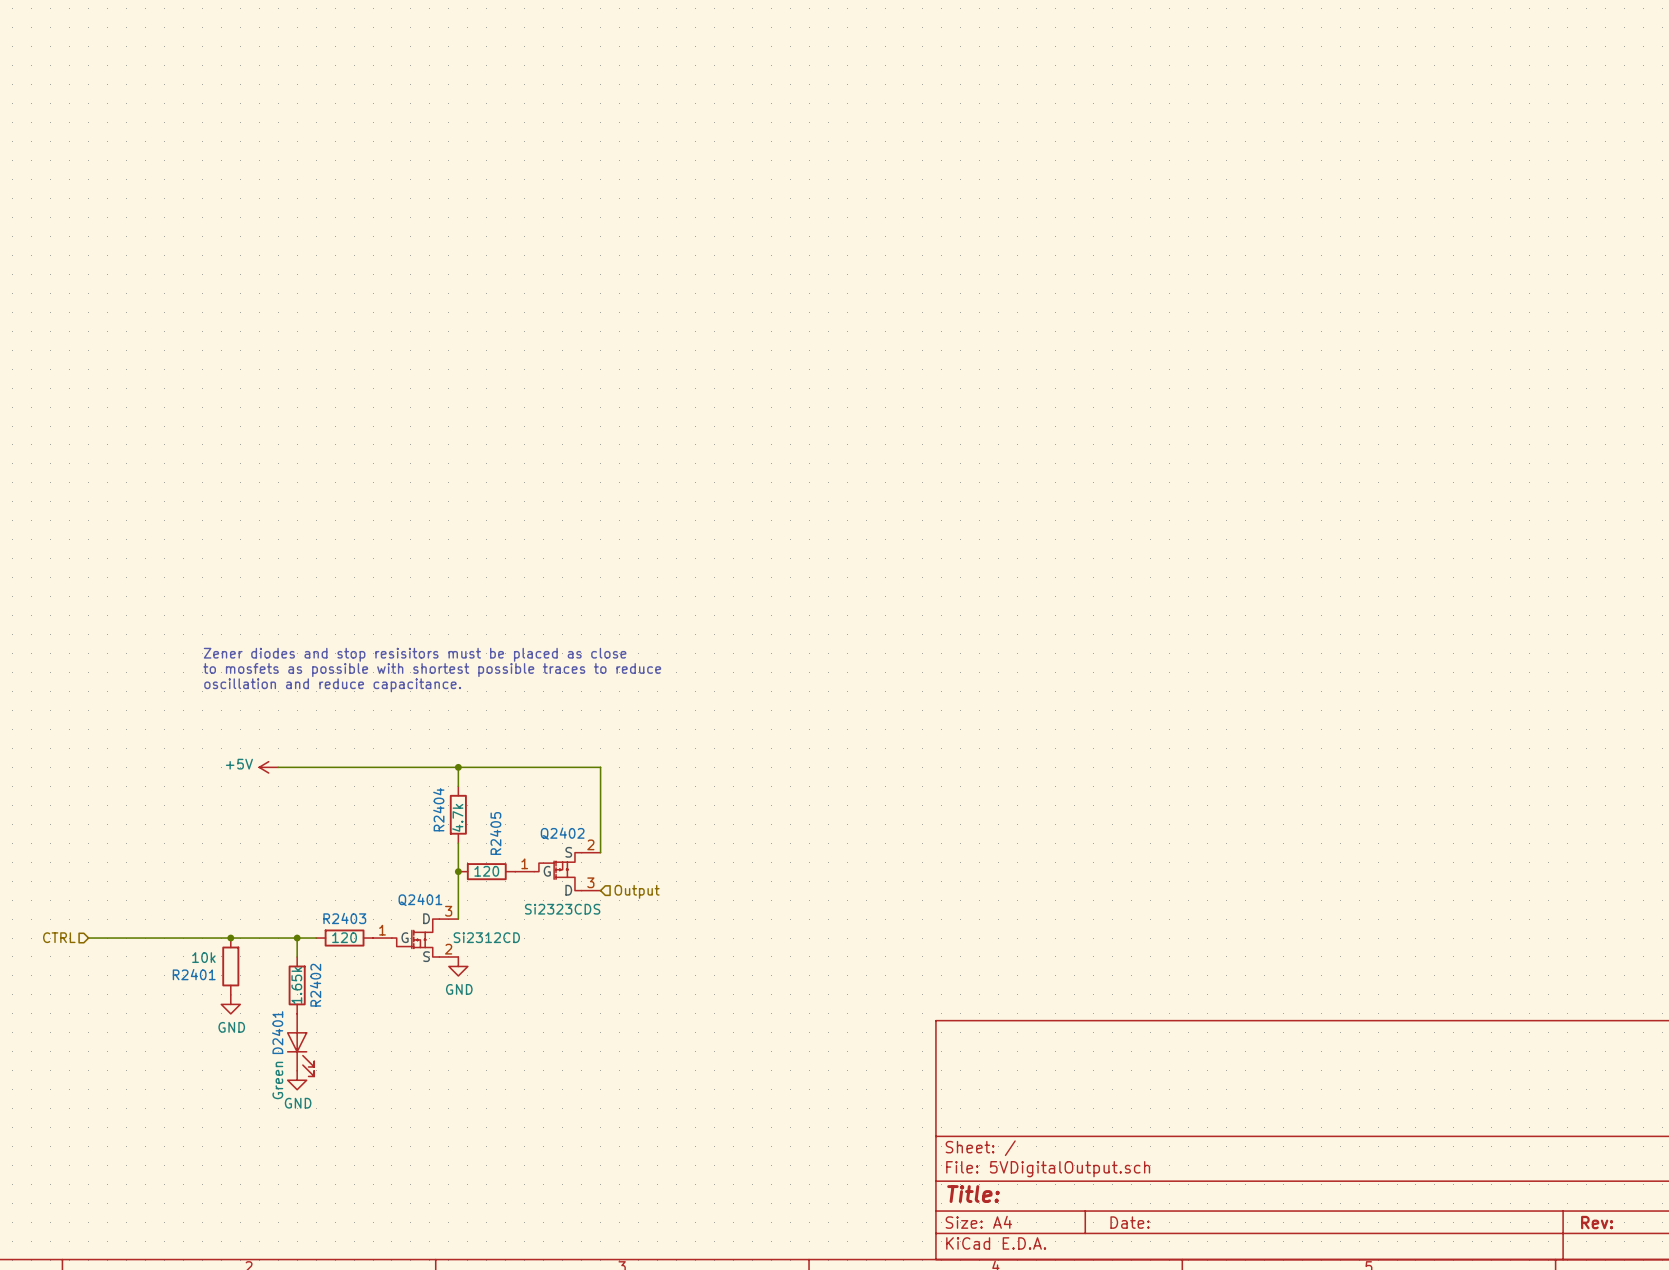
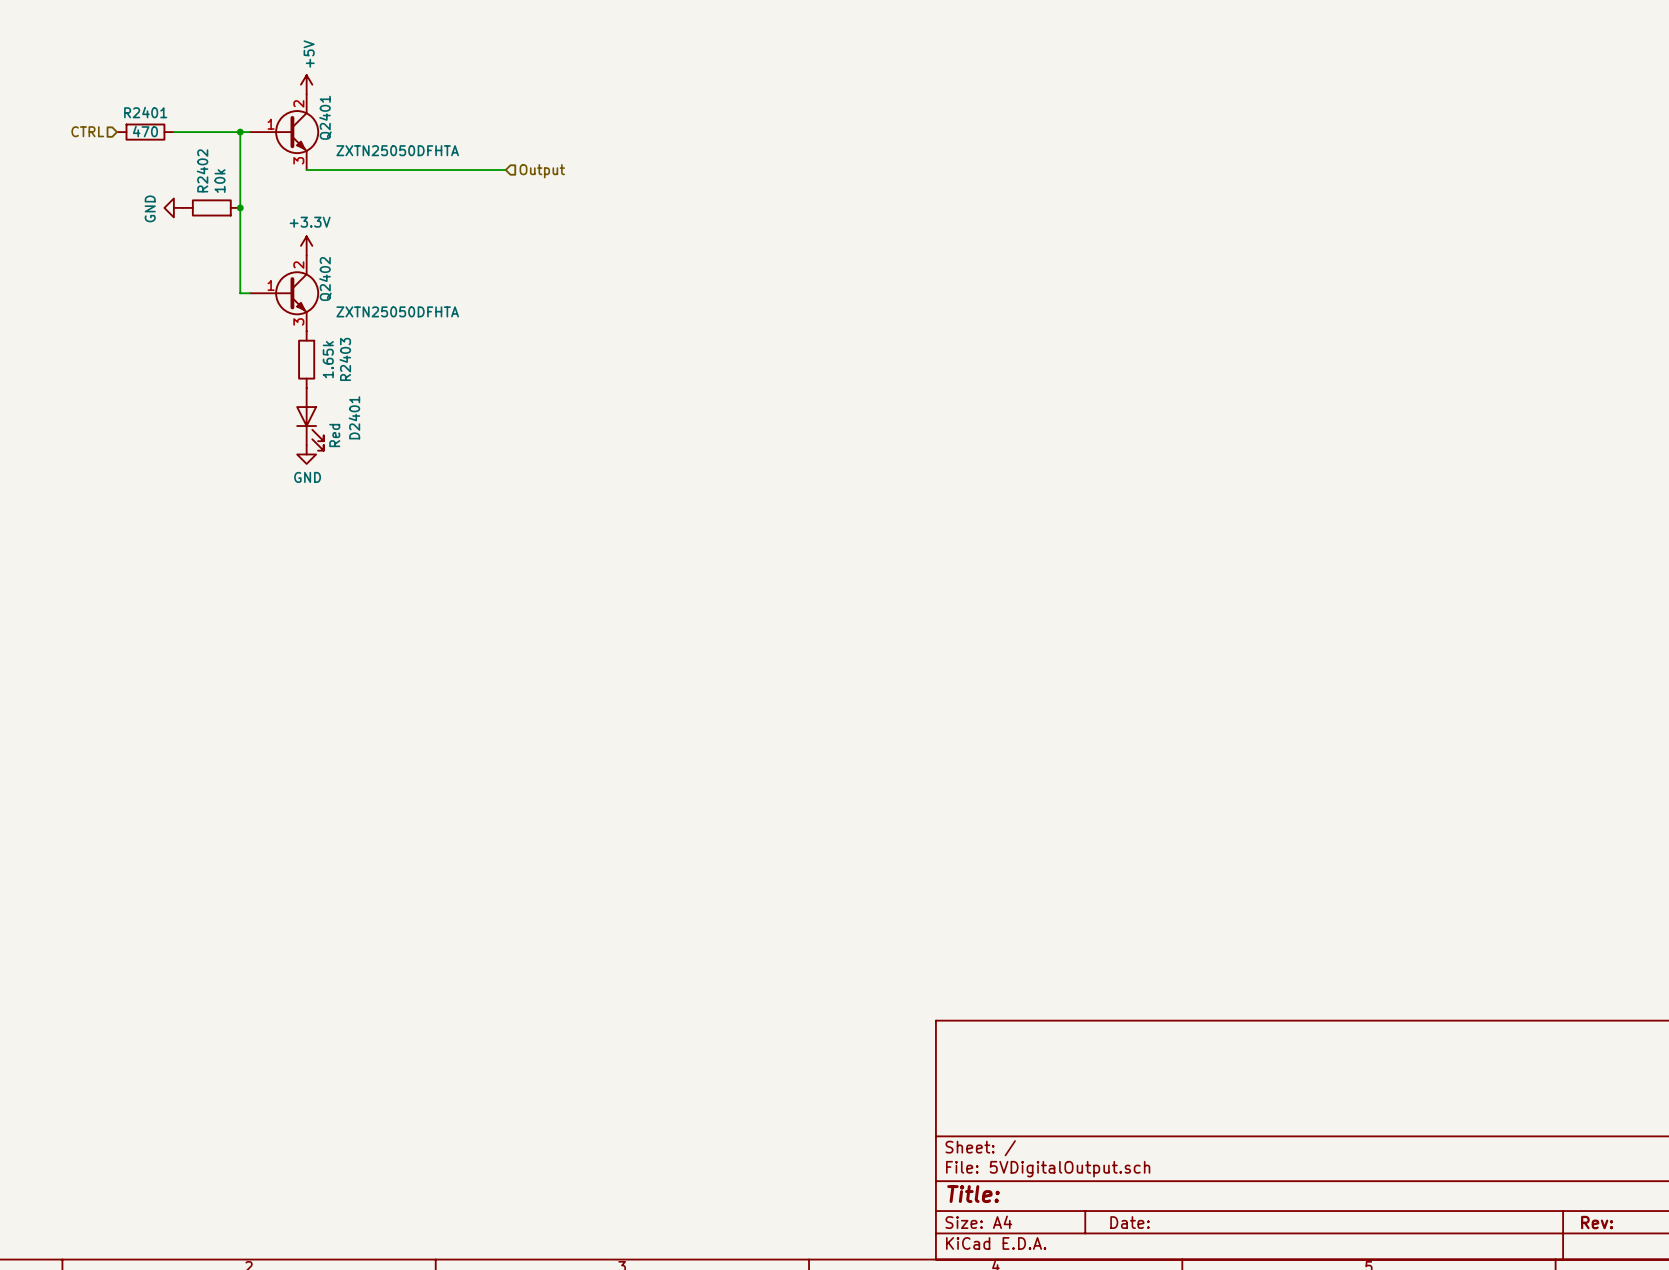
power symbol: none -> +5V (306, 84)
hierarchical label: none -> CTRL (87, 131)
wire: none -> (173, 132) (249, 132)
wire: none -> (240, 132) (240, 293) (249, 293)
junction: none -> (240, 132)
wire: none -> (306, 170) (505, 170)
hierarchical label: none -> Output (542, 171)
power symbol: none -> GND (173, 207)
junction: none -> (240, 207)
power symbol: none -> +3.3V (306, 245)
power symbol: none -> GND (306, 454)
text: Zener diodes and stop resisitors must be placed as close (415, 654) -> none
text: to mosfets as possible with shortest possible traces to reduce (432, 670) -> none
text: oscillation and reduce capacitance. (332, 685) -> none
power symbol: +5V (268, 767) -> none
wire: (278, 767) (600, 767) (600, 852) -> none
wire: (458, 767) (458, 786) -> none
junction: (458, 767) -> none
R2404: 4.7k (458, 814) -> none
Q2402 name position: Q2402 (562, 833) -> Q2402 (325, 278)
wire: (458, 843) (458, 919) -> none
Q2402 symbol: [515, 852, 601, 891] -> [249, 255, 320, 332]
junction: (458, 871) -> none
R2405: 120 (486, 871) -> none
hierarchical label: Output (637, 891) -> none
Q2401 name position: Q2401 (420, 899) -> Q2401 (325, 117)
Q2402 value: Si2323CDS (562, 909) -> ZXTN25050DFHTA (397, 311)
R2403 name position: R2403 (344, 918) -> R2403 (345, 359)
Q2401 symbol: [373, 919, 459, 957] -> [249, 94, 320, 171]
hierarchical label: CTRL (59, 937) -> none
R2403 value: 120 (344, 937) -> 1.65k (328, 359)
Q2401 value: Si2312CD (486, 937) -> ZXTN25050DFHTA (397, 150)
wire: (88, 938) (316, 938) -> none
junction: (230, 938) -> none
wire: (297, 938) (297, 956) -> none
junction: (297, 938) -> none
R2403 rotation: 0° (344, 938) -> 90° clockwise (306, 359)
R2403 position: (344, 938) -> (306, 359)
R2401 value: 10k (203, 957) -> 470 (145, 131)
R2401 rotation: 0° (230, 966) -> 90° clockwise (145, 132)
R2401 position: (230, 966) -> (145, 132)
power symbol: GND (458, 966) -> none
R2401 name position: R2401 (194, 974) -> R2401 (145, 112)
R2402 value: 1.65k (296, 985) -> 10k (220, 181)
R2402 rotation: 0° (297, 985) -> 90° clockwise (211, 207)
R2402 position: (297, 985) -> (211, 207)
R2402 name position: R2402 (315, 985) -> R2402 (202, 170)
power symbol: GND (230, 1004) -> none
D2401 name position: D2401 (277, 1032) -> D2401 (354, 417)
D2401 position: (300, 1045) -> (310, 419)
D2401 value: Green (277, 1080) -> Red (334, 435)
power symbol: GND (297, 1080) -> none

